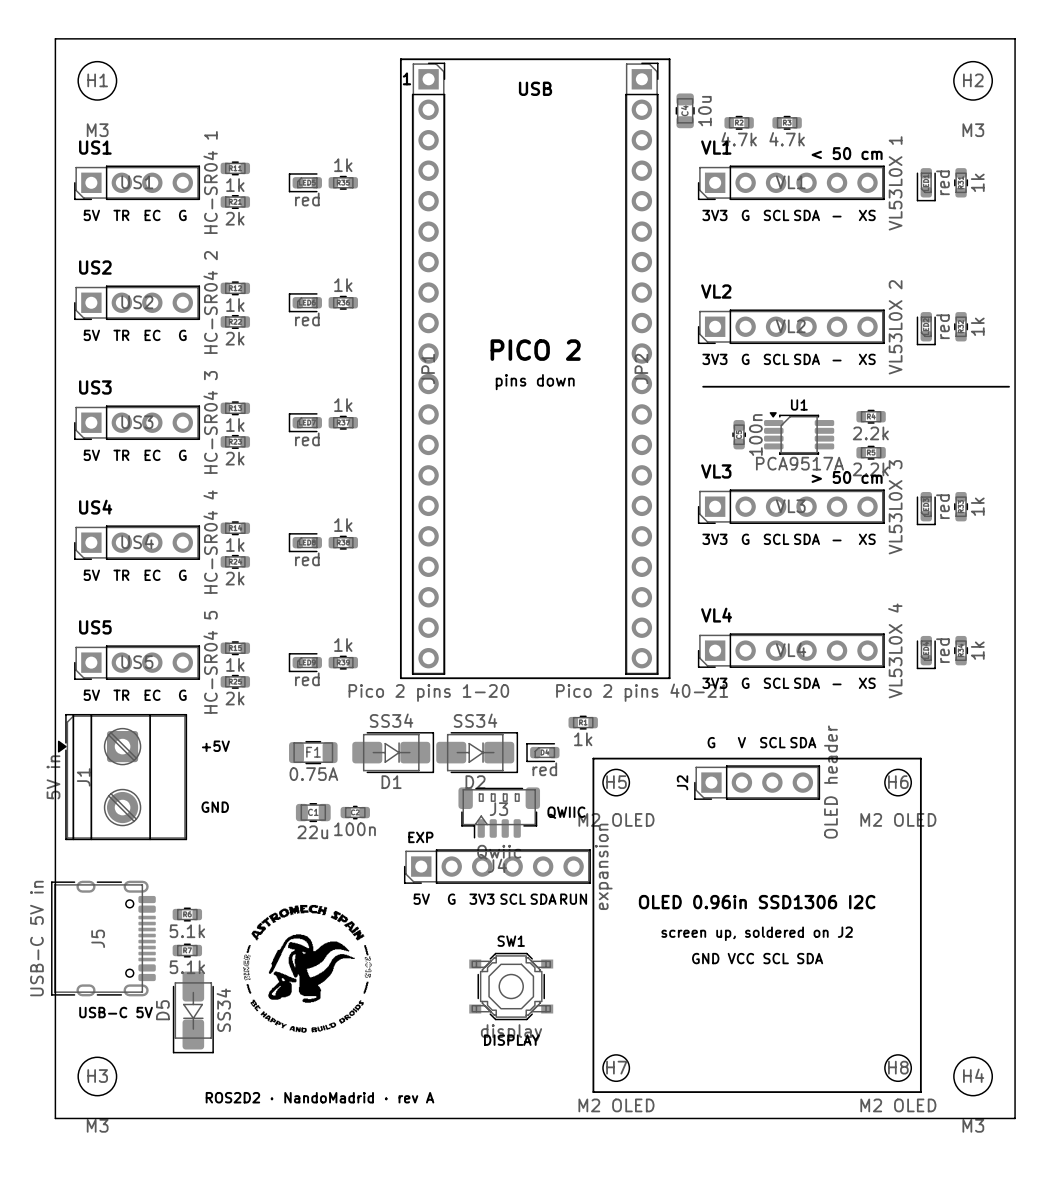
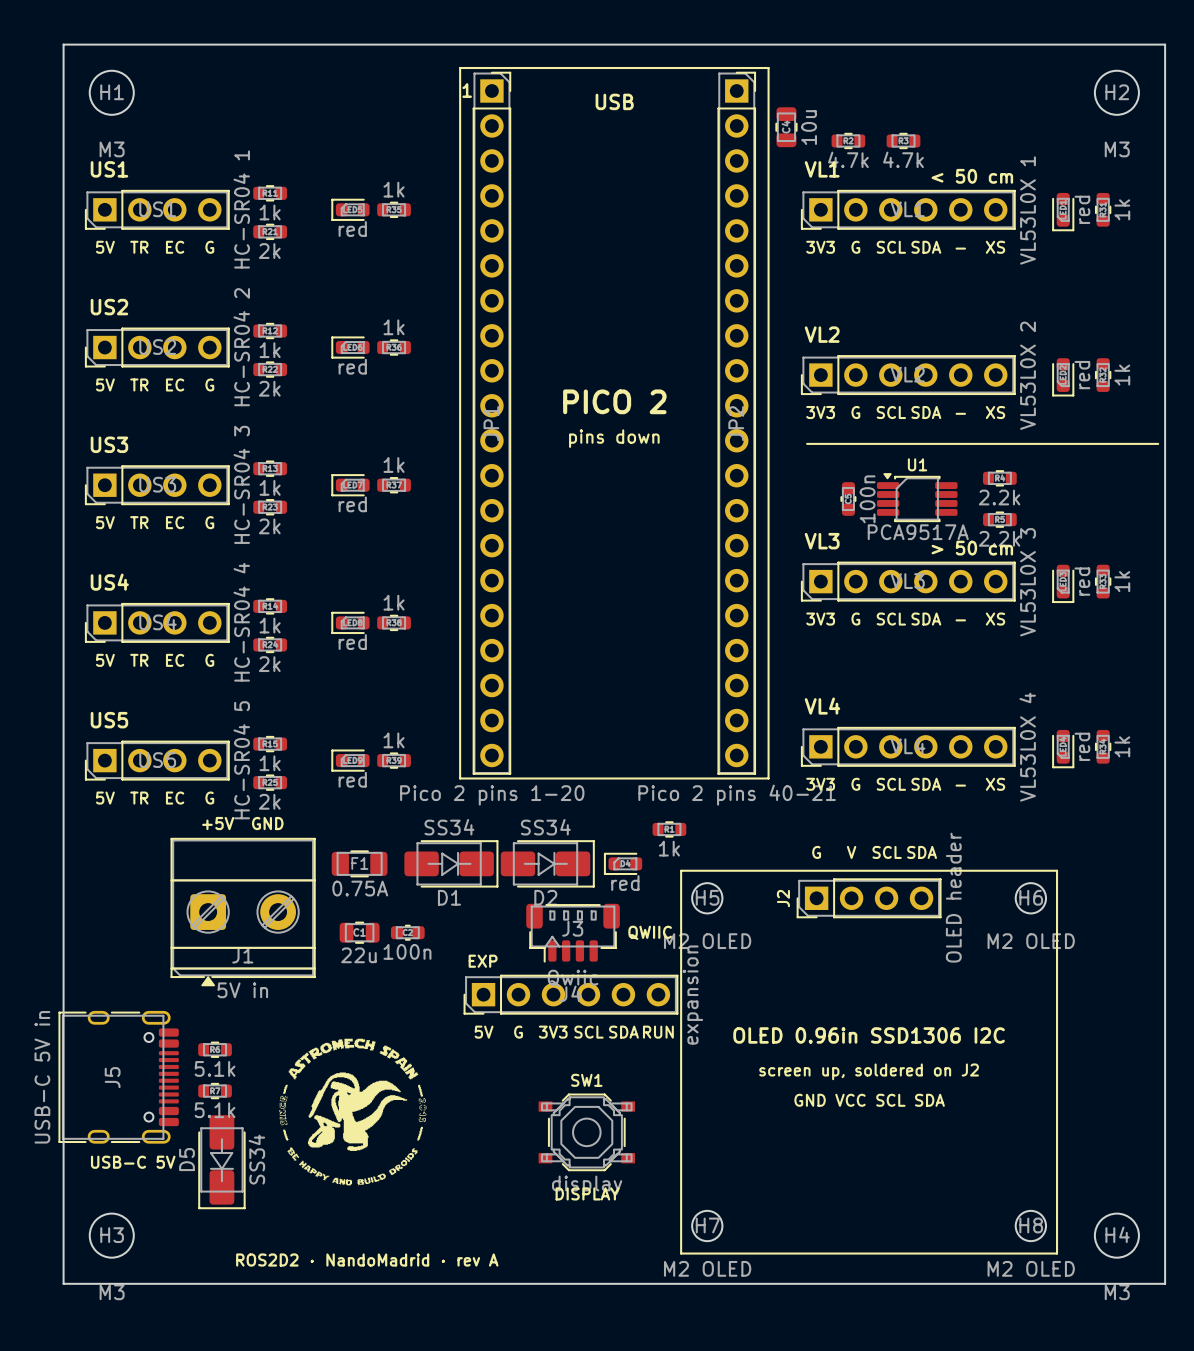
text: none -> +5V GND (242, 823)
text: +5V (215, 746) -> none
J1 rotation: 0° (122, 777) -> 90° counterclockwise (243, 912)
J1 position: (122, 777) -> (243, 912)
text: GND (215, 807) -> none

